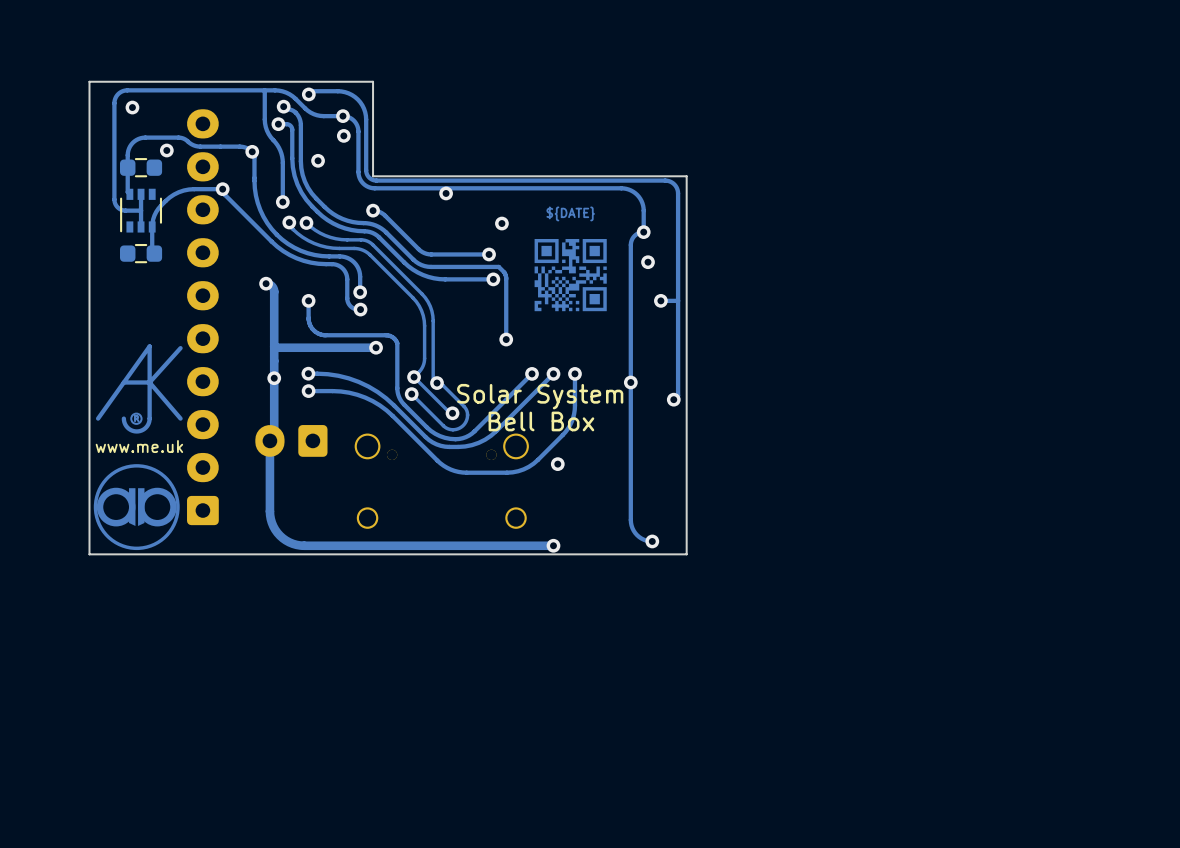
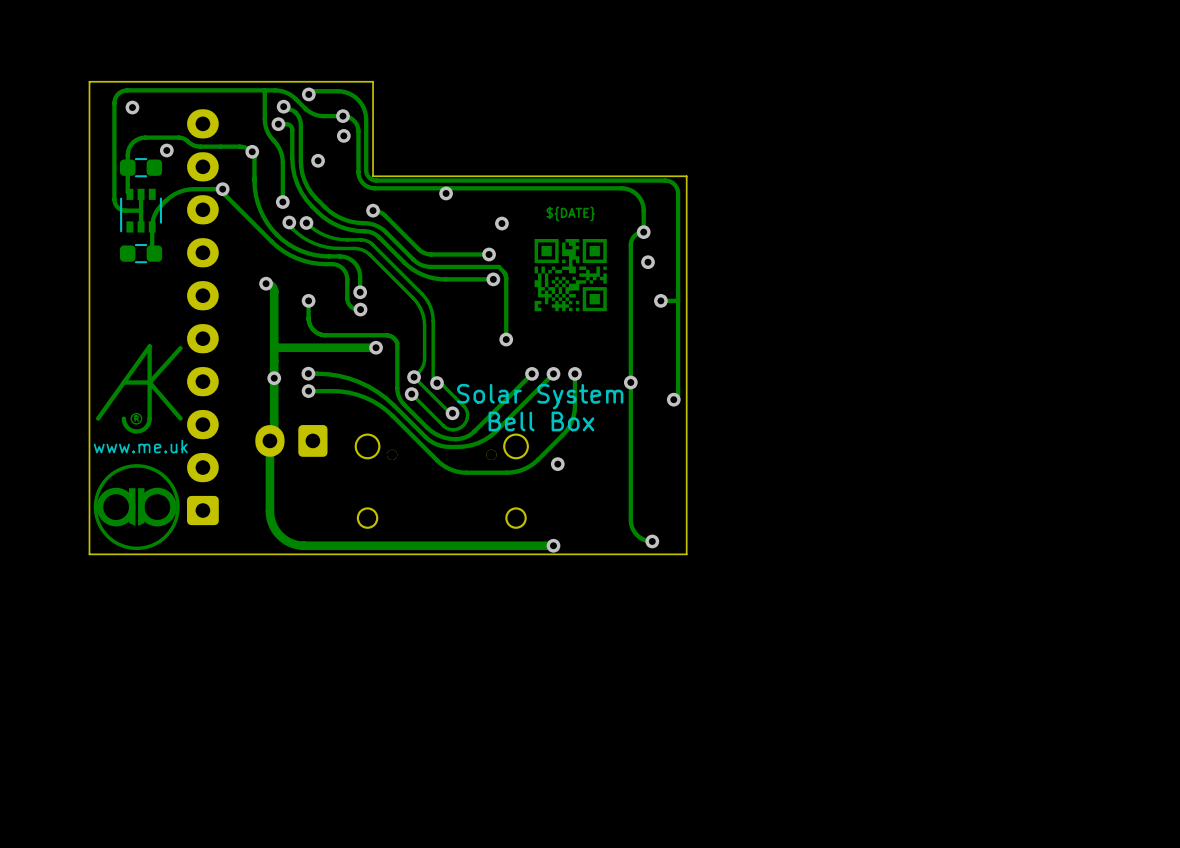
drawing shape: [95, 344, 184, 453] -> [95, 344, 183, 434]
text: none -> www.me.uk (140, 446)

